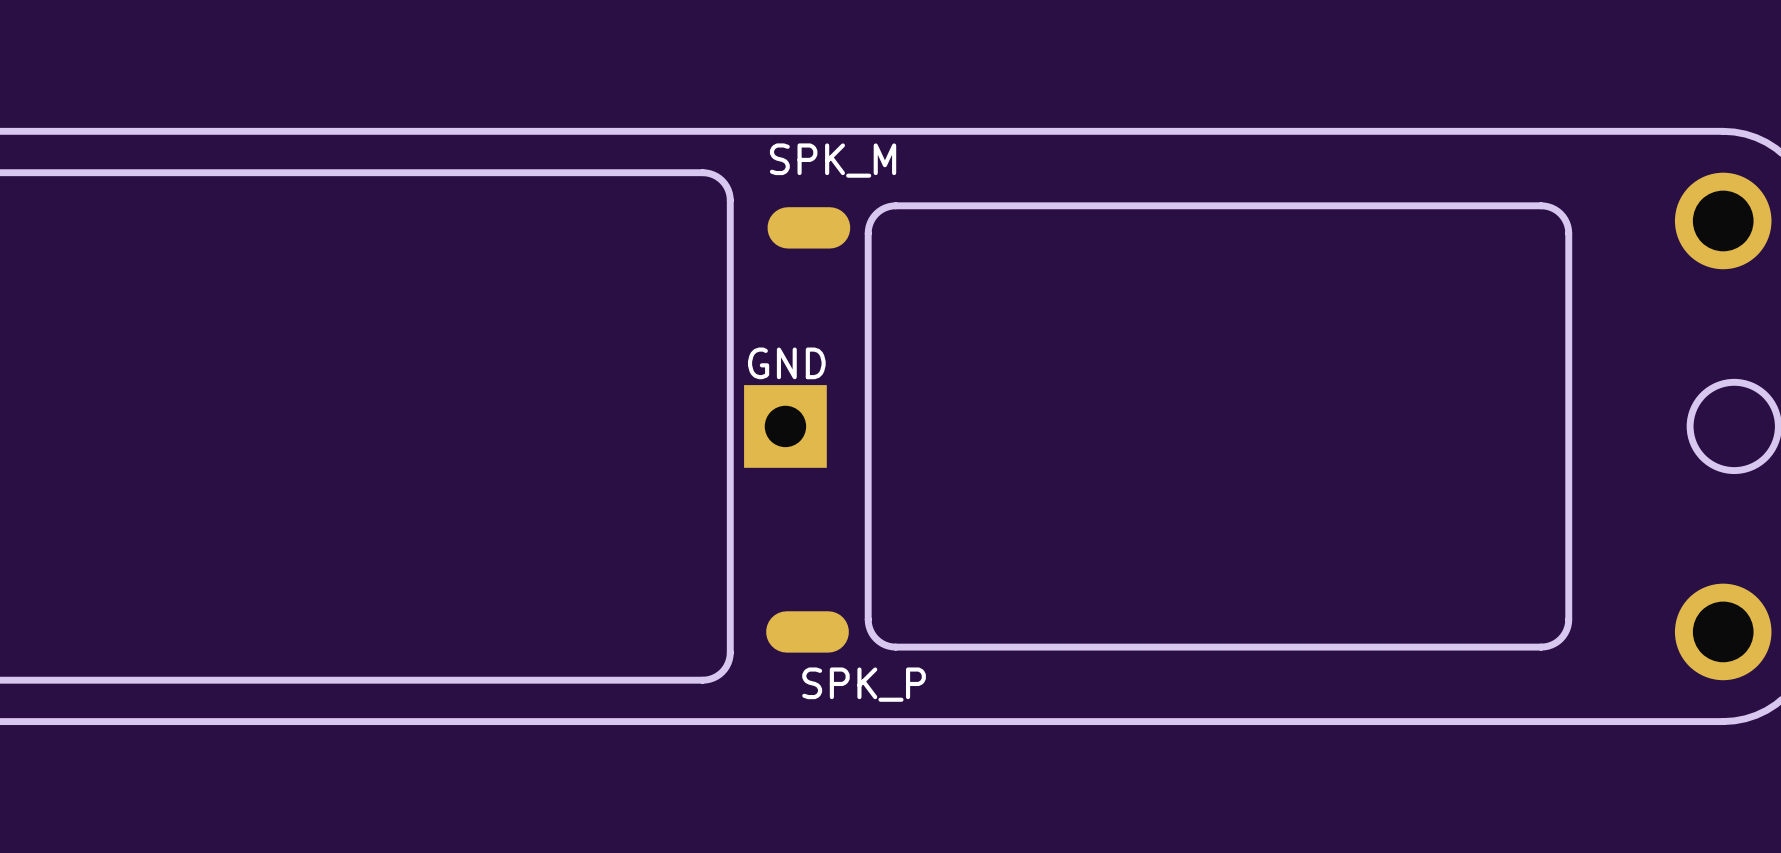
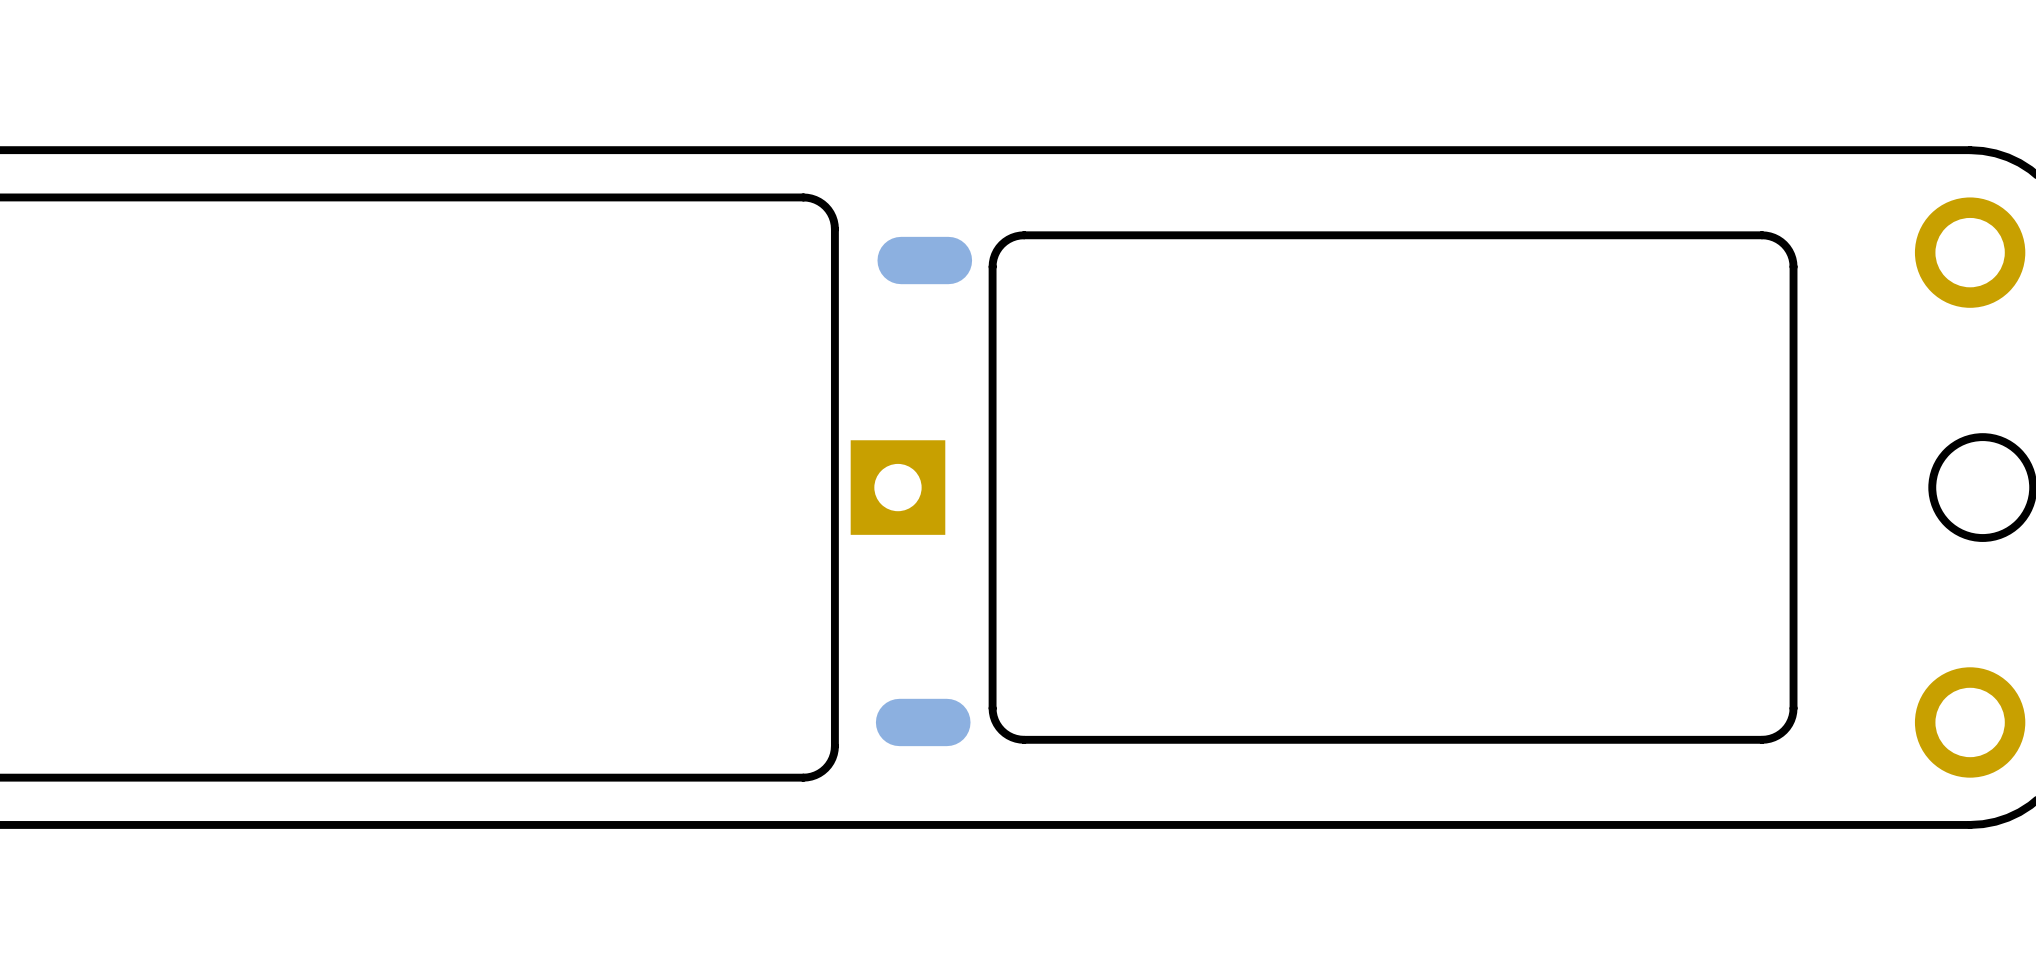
text: SPK_M (833, 160) -> none
text: GND (786, 363) -> none
text: SPK_P (864, 684) -> none

